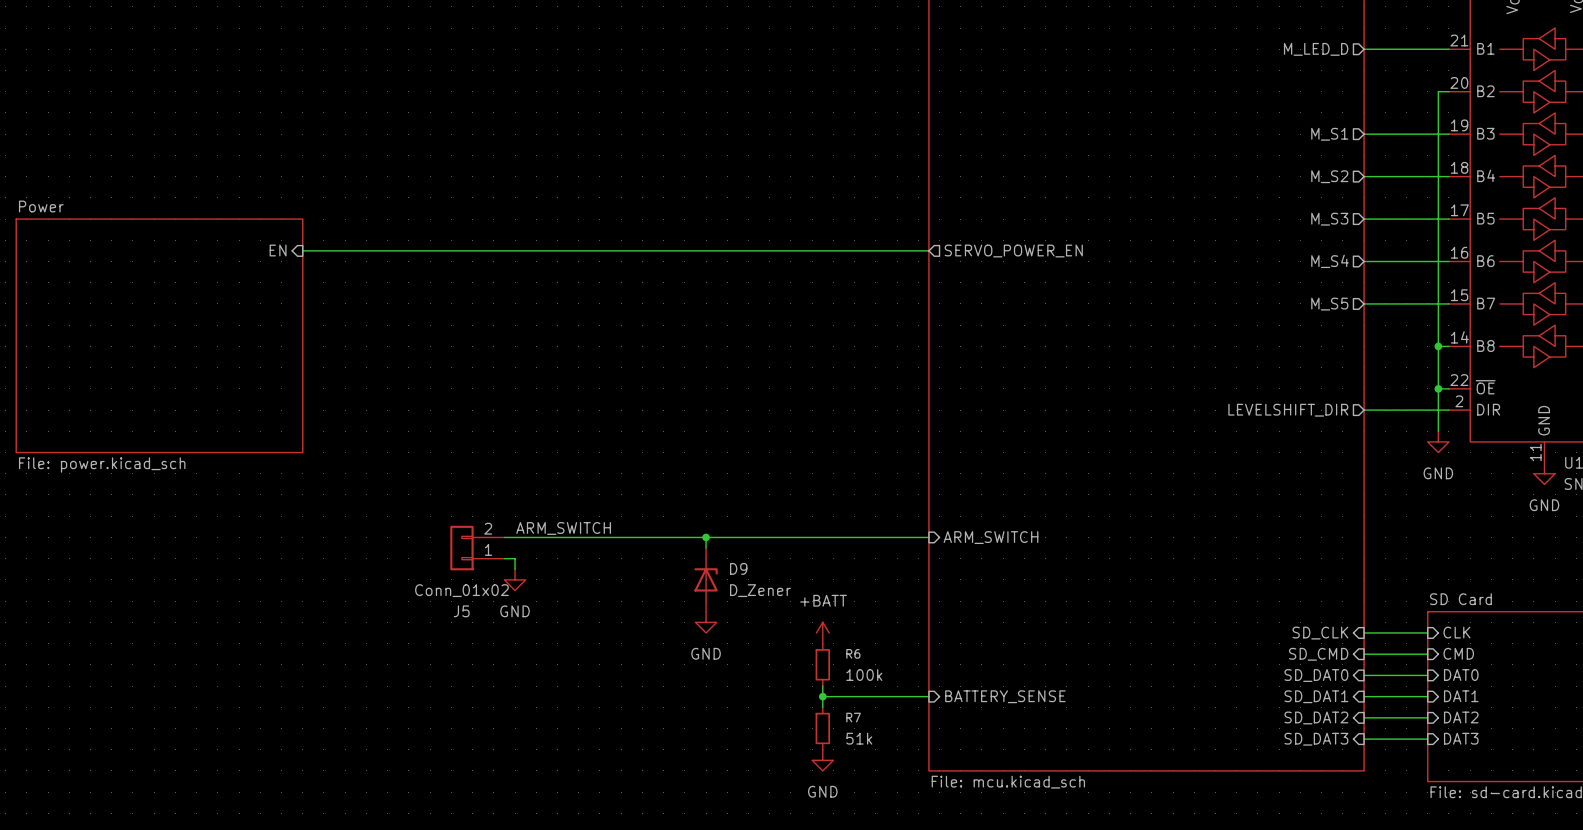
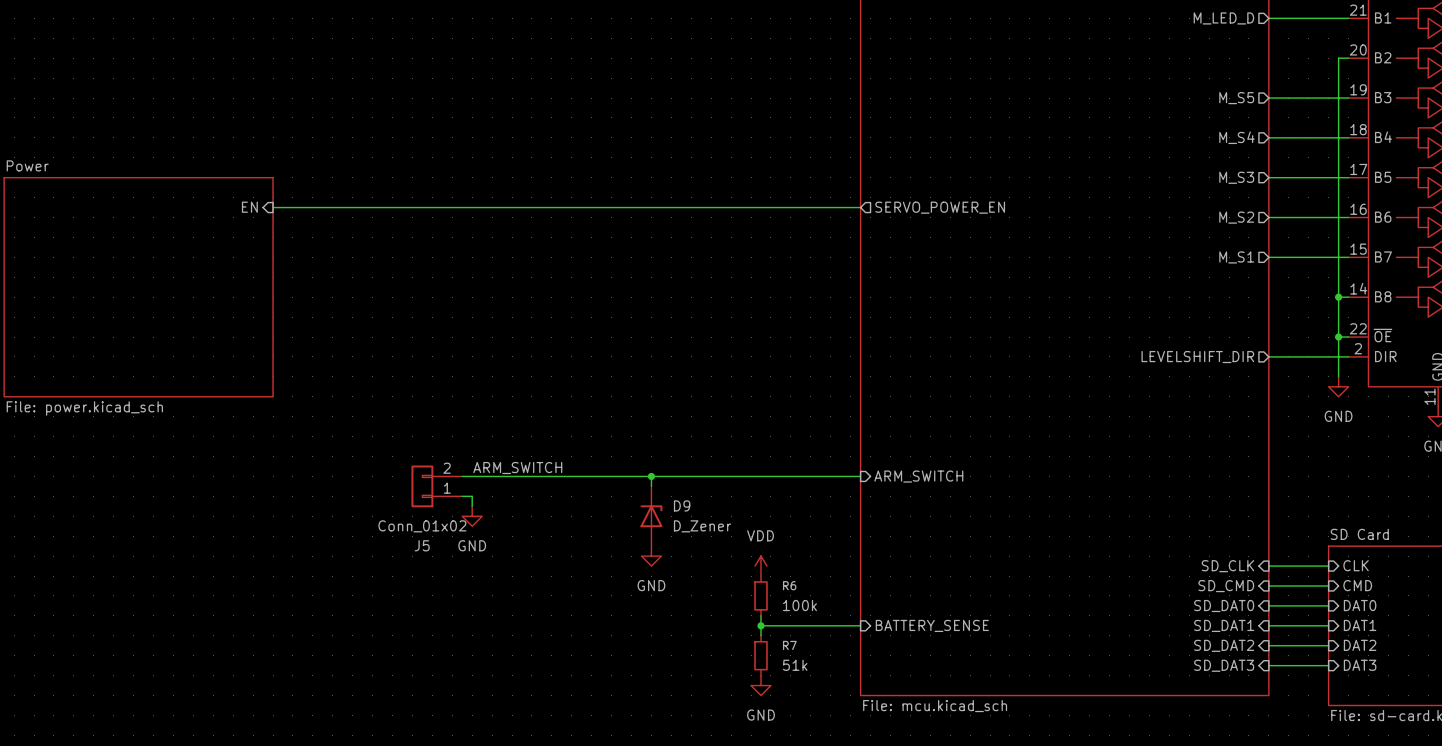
sheet pin: M_S1 (1329, 134) -> M_S5 (1236, 98)
sheet pin: M_S2 (1329, 176) -> M_S4 (1236, 137)
sheet pin: M_S4 (1330, 261) -> M_S2 (1236, 217)
sheet pin: M_S5 (1329, 304) -> M_S1 (1236, 257)
power symbol: +BATT (822, 632) -> VDD (760, 566)

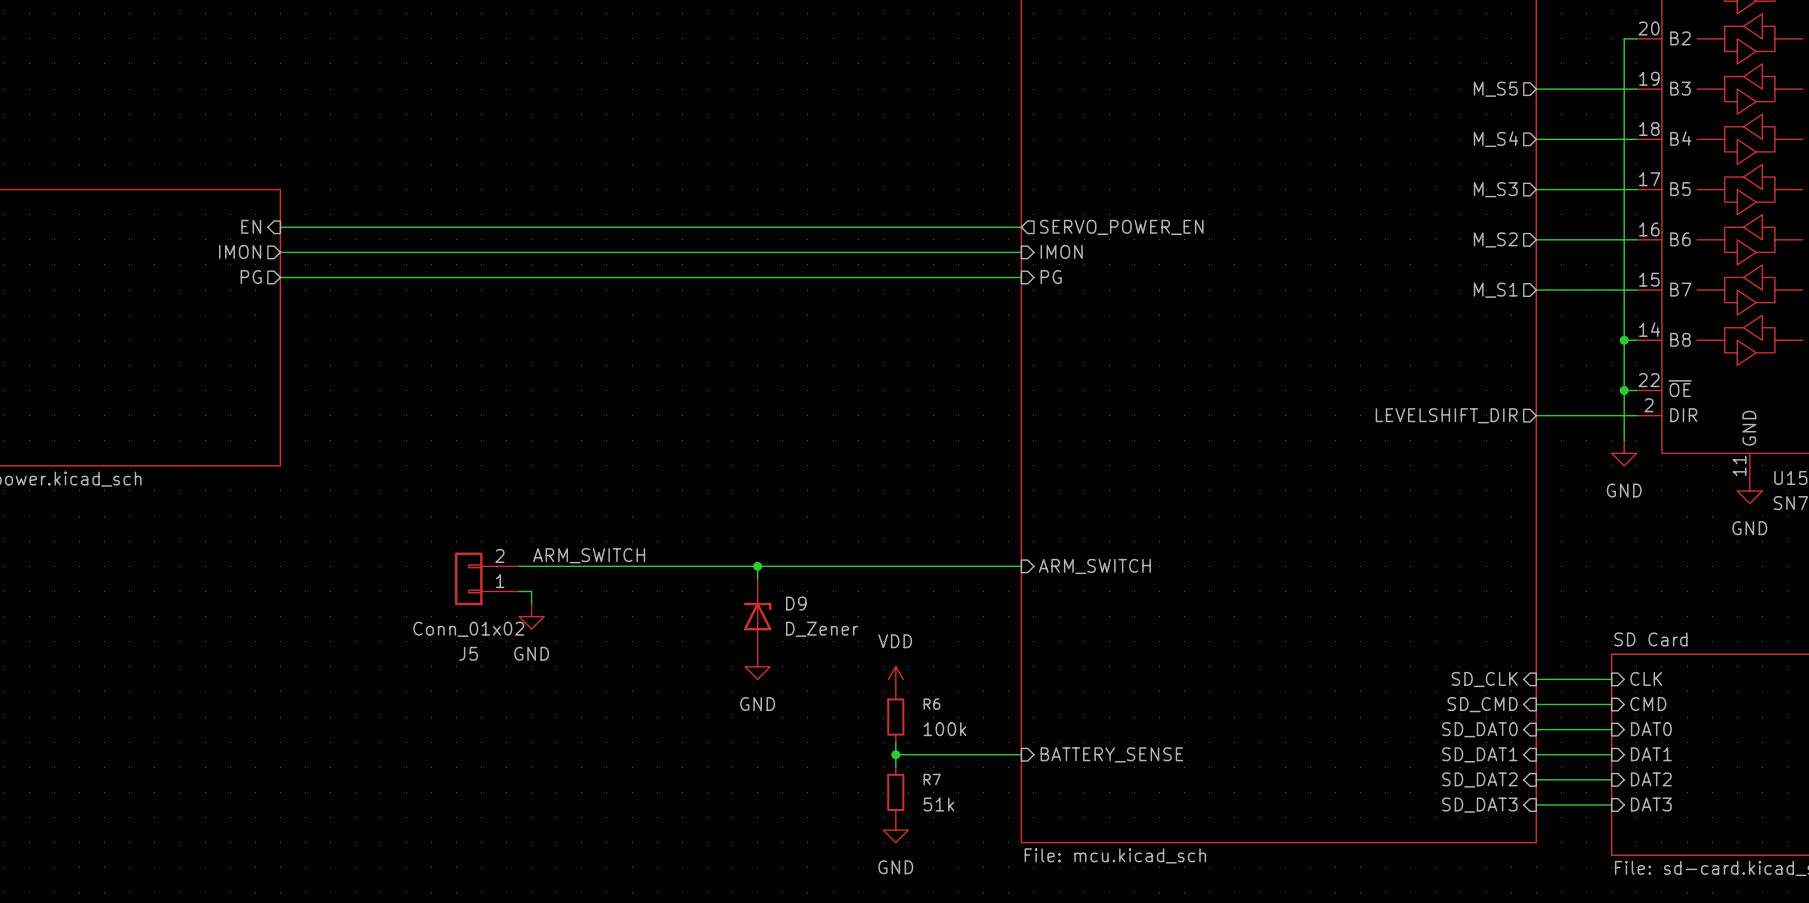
sheet pin: none -> IMON (240, 251)
wire: none -> (280, 252) (1021, 252)
sheet pin: none -> IMON (1061, 251)
sheet pin: none -> PG (251, 277)
wire: none -> (280, 277) (1021, 277)
sheet pin: none -> PG (1051, 277)

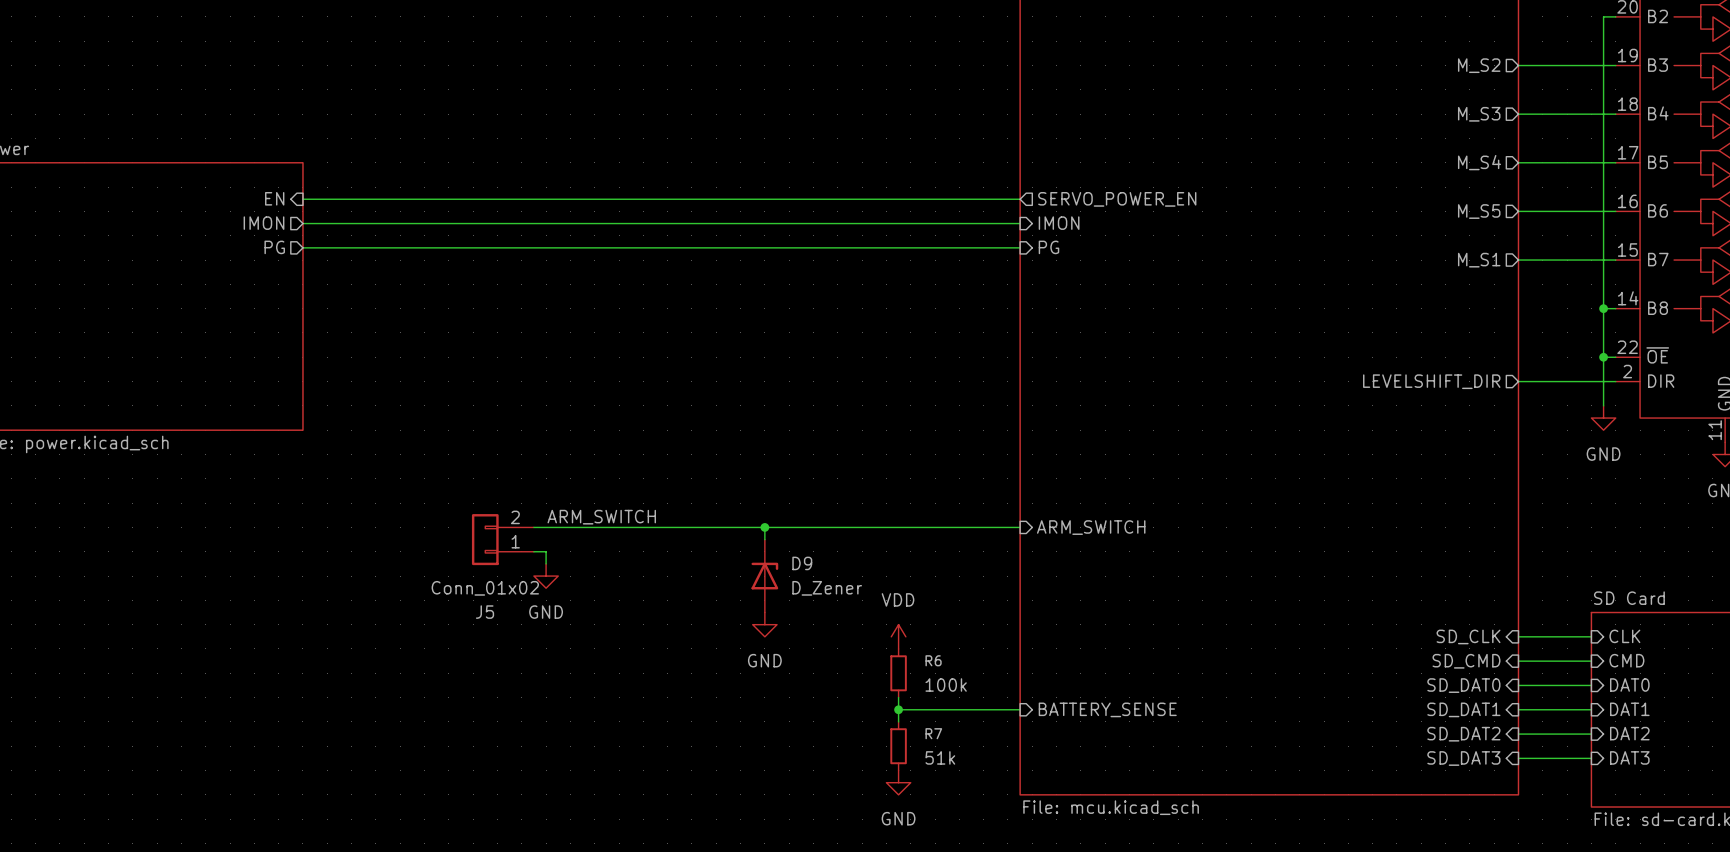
sheet pin: M_S5 (1495, 89) -> M_S2 (1479, 65)
sheet pin: M_S4 (1496, 139) -> M_S3 (1479, 114)
sheet pin: M_S3 (1495, 189) -> M_S4 (1479, 162)
sheet pin: M_S2 (1495, 239) -> M_S5 (1479, 211)

